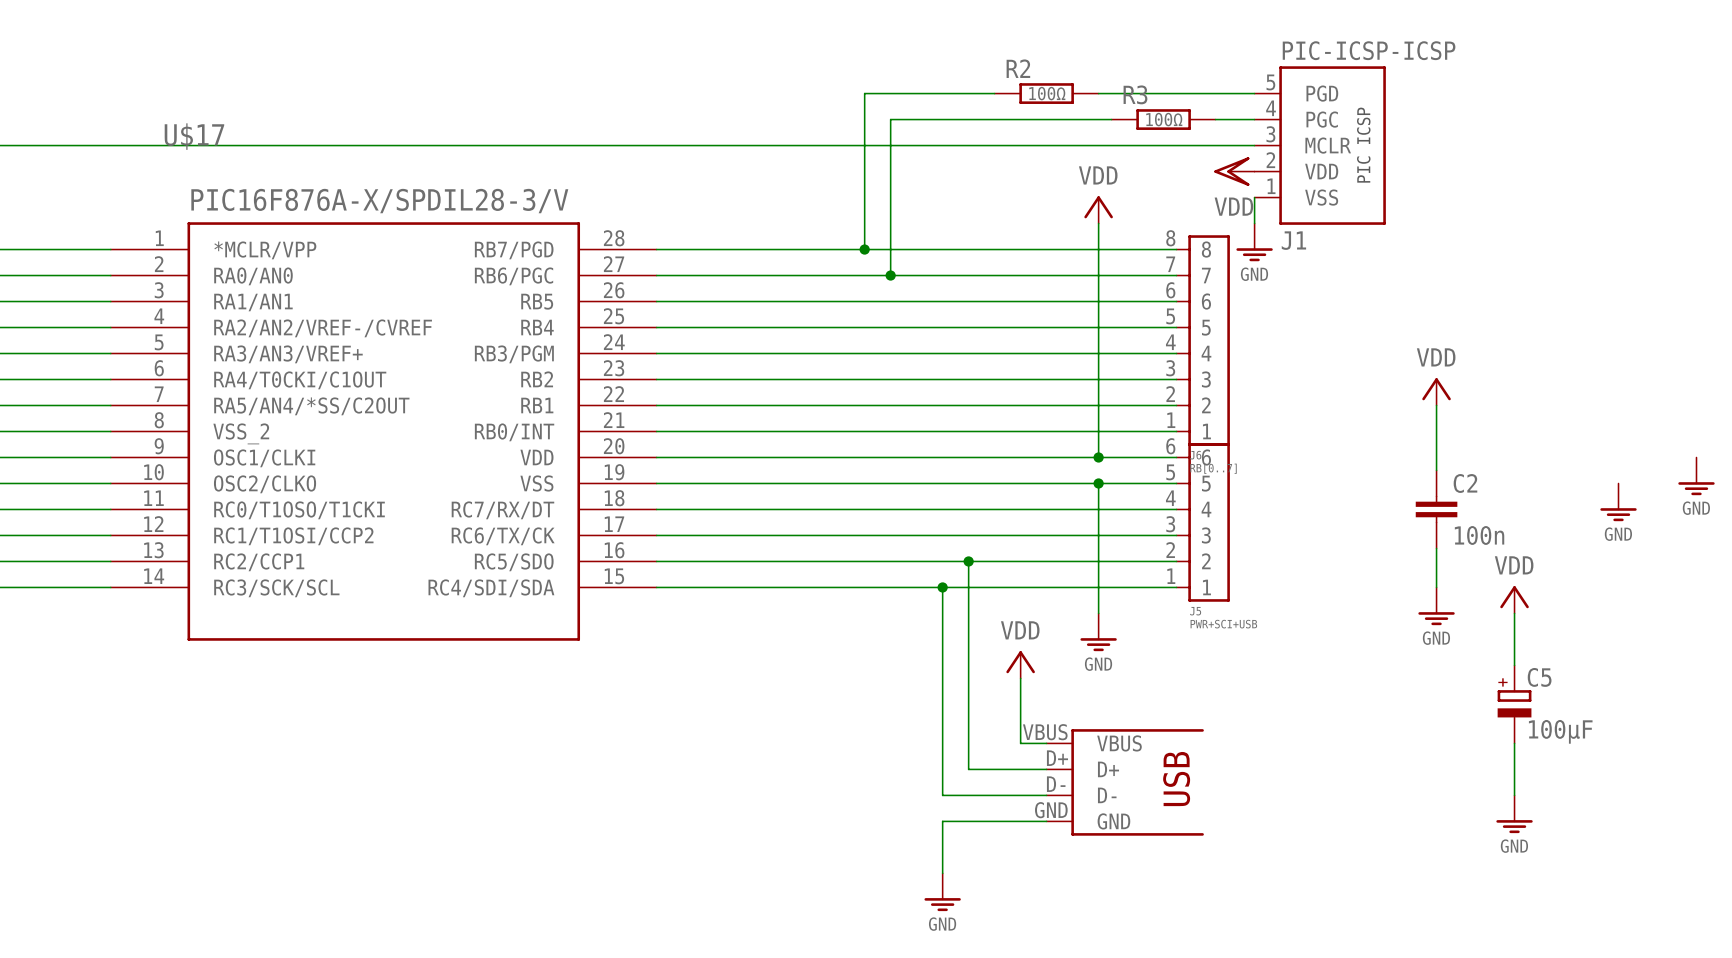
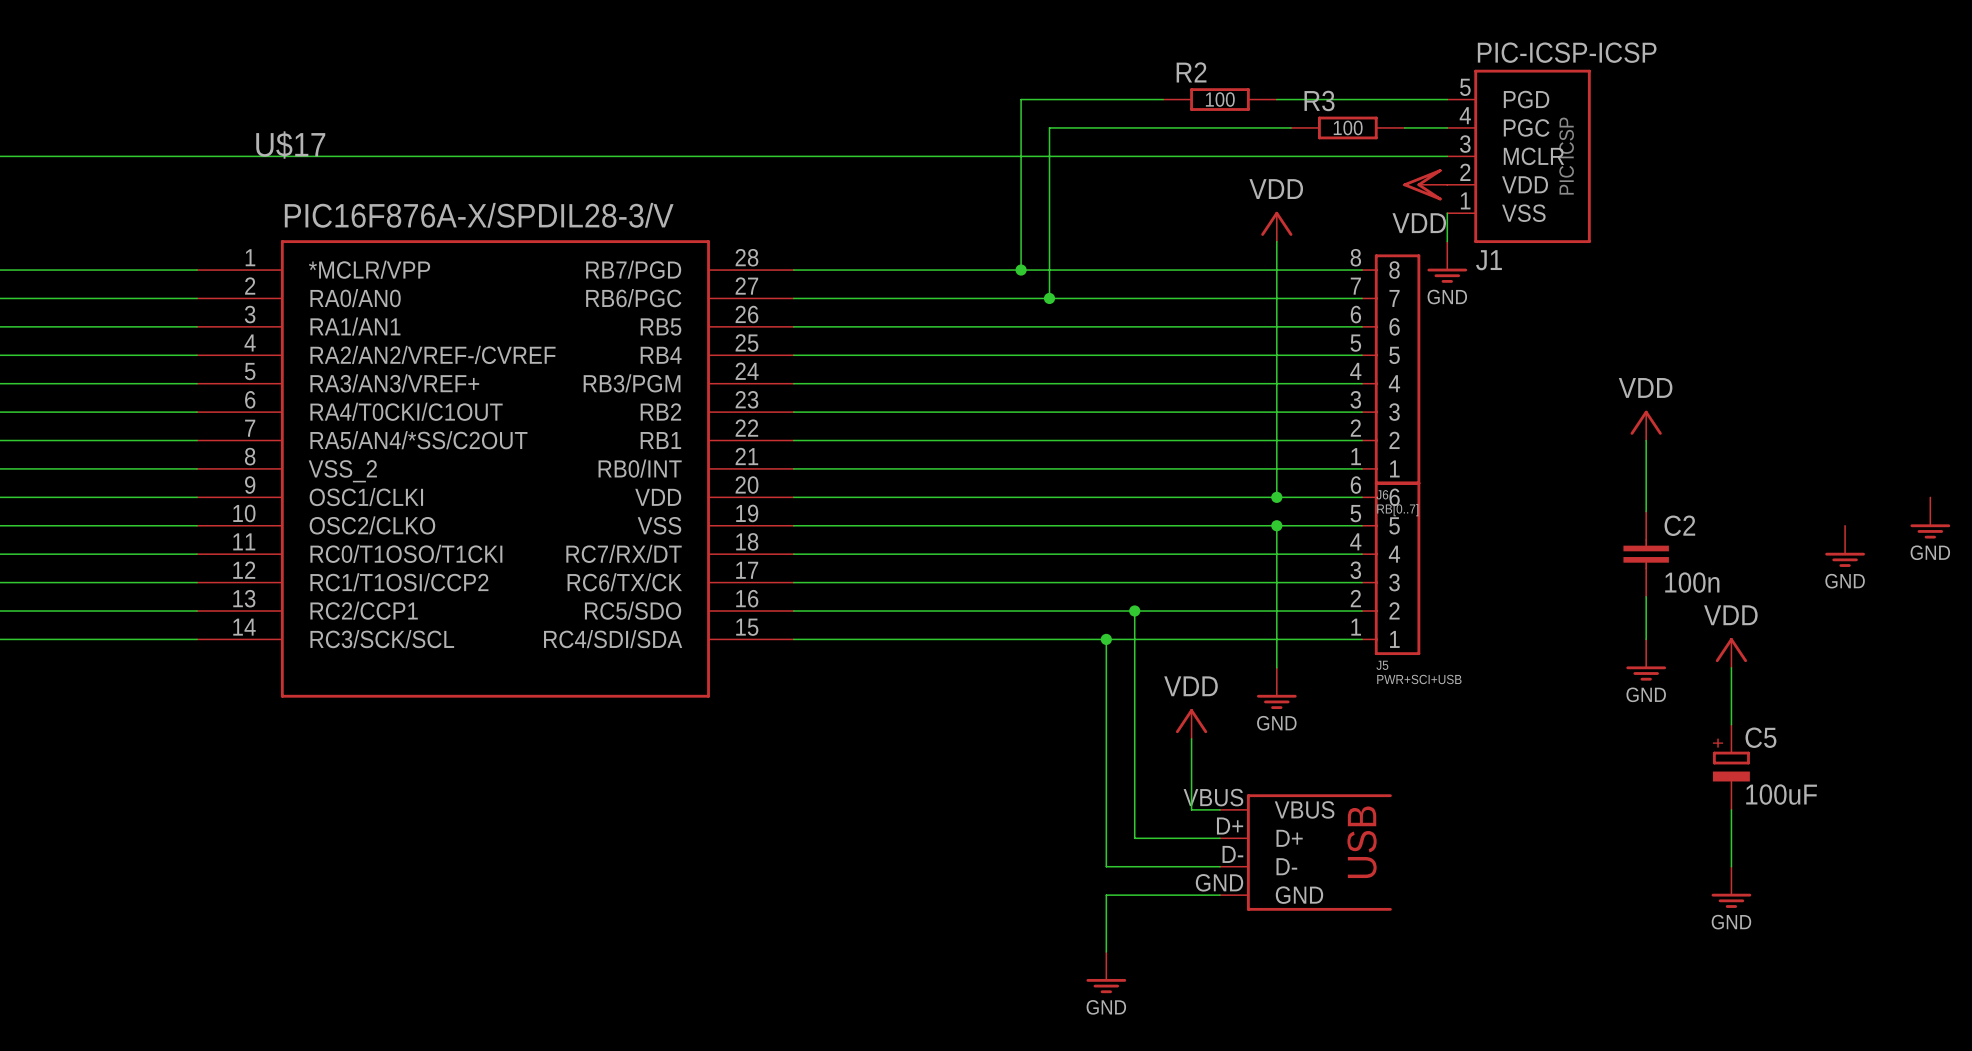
R2 value: 100Ω (1047, 93) -> 100 (1220, 99)
R3 value: 100Ω (1164, 119) -> 100 (1348, 127)
C5 value: 100μF (1560, 731) -> 100uF (1781, 794)

